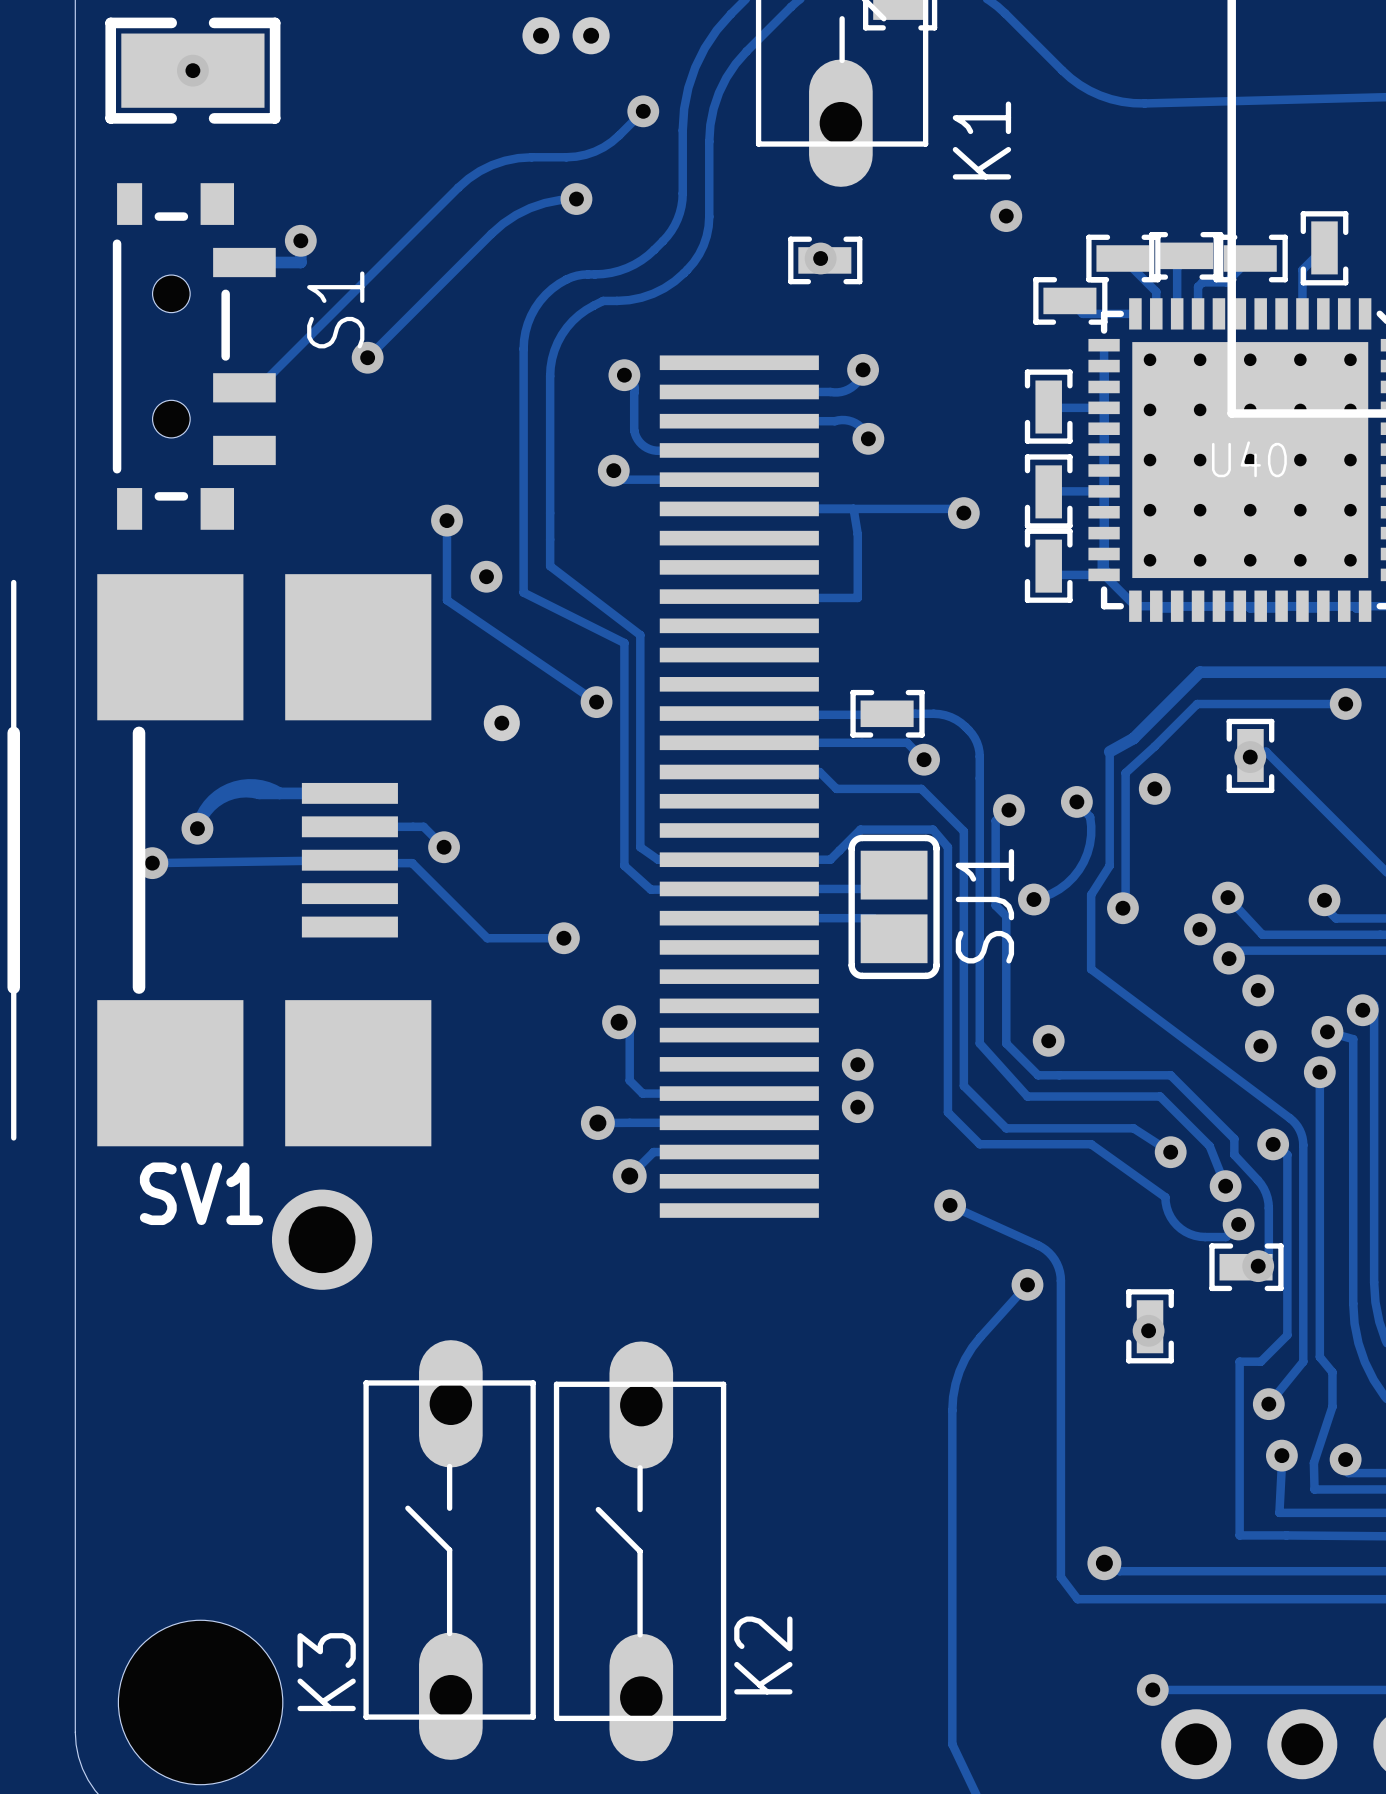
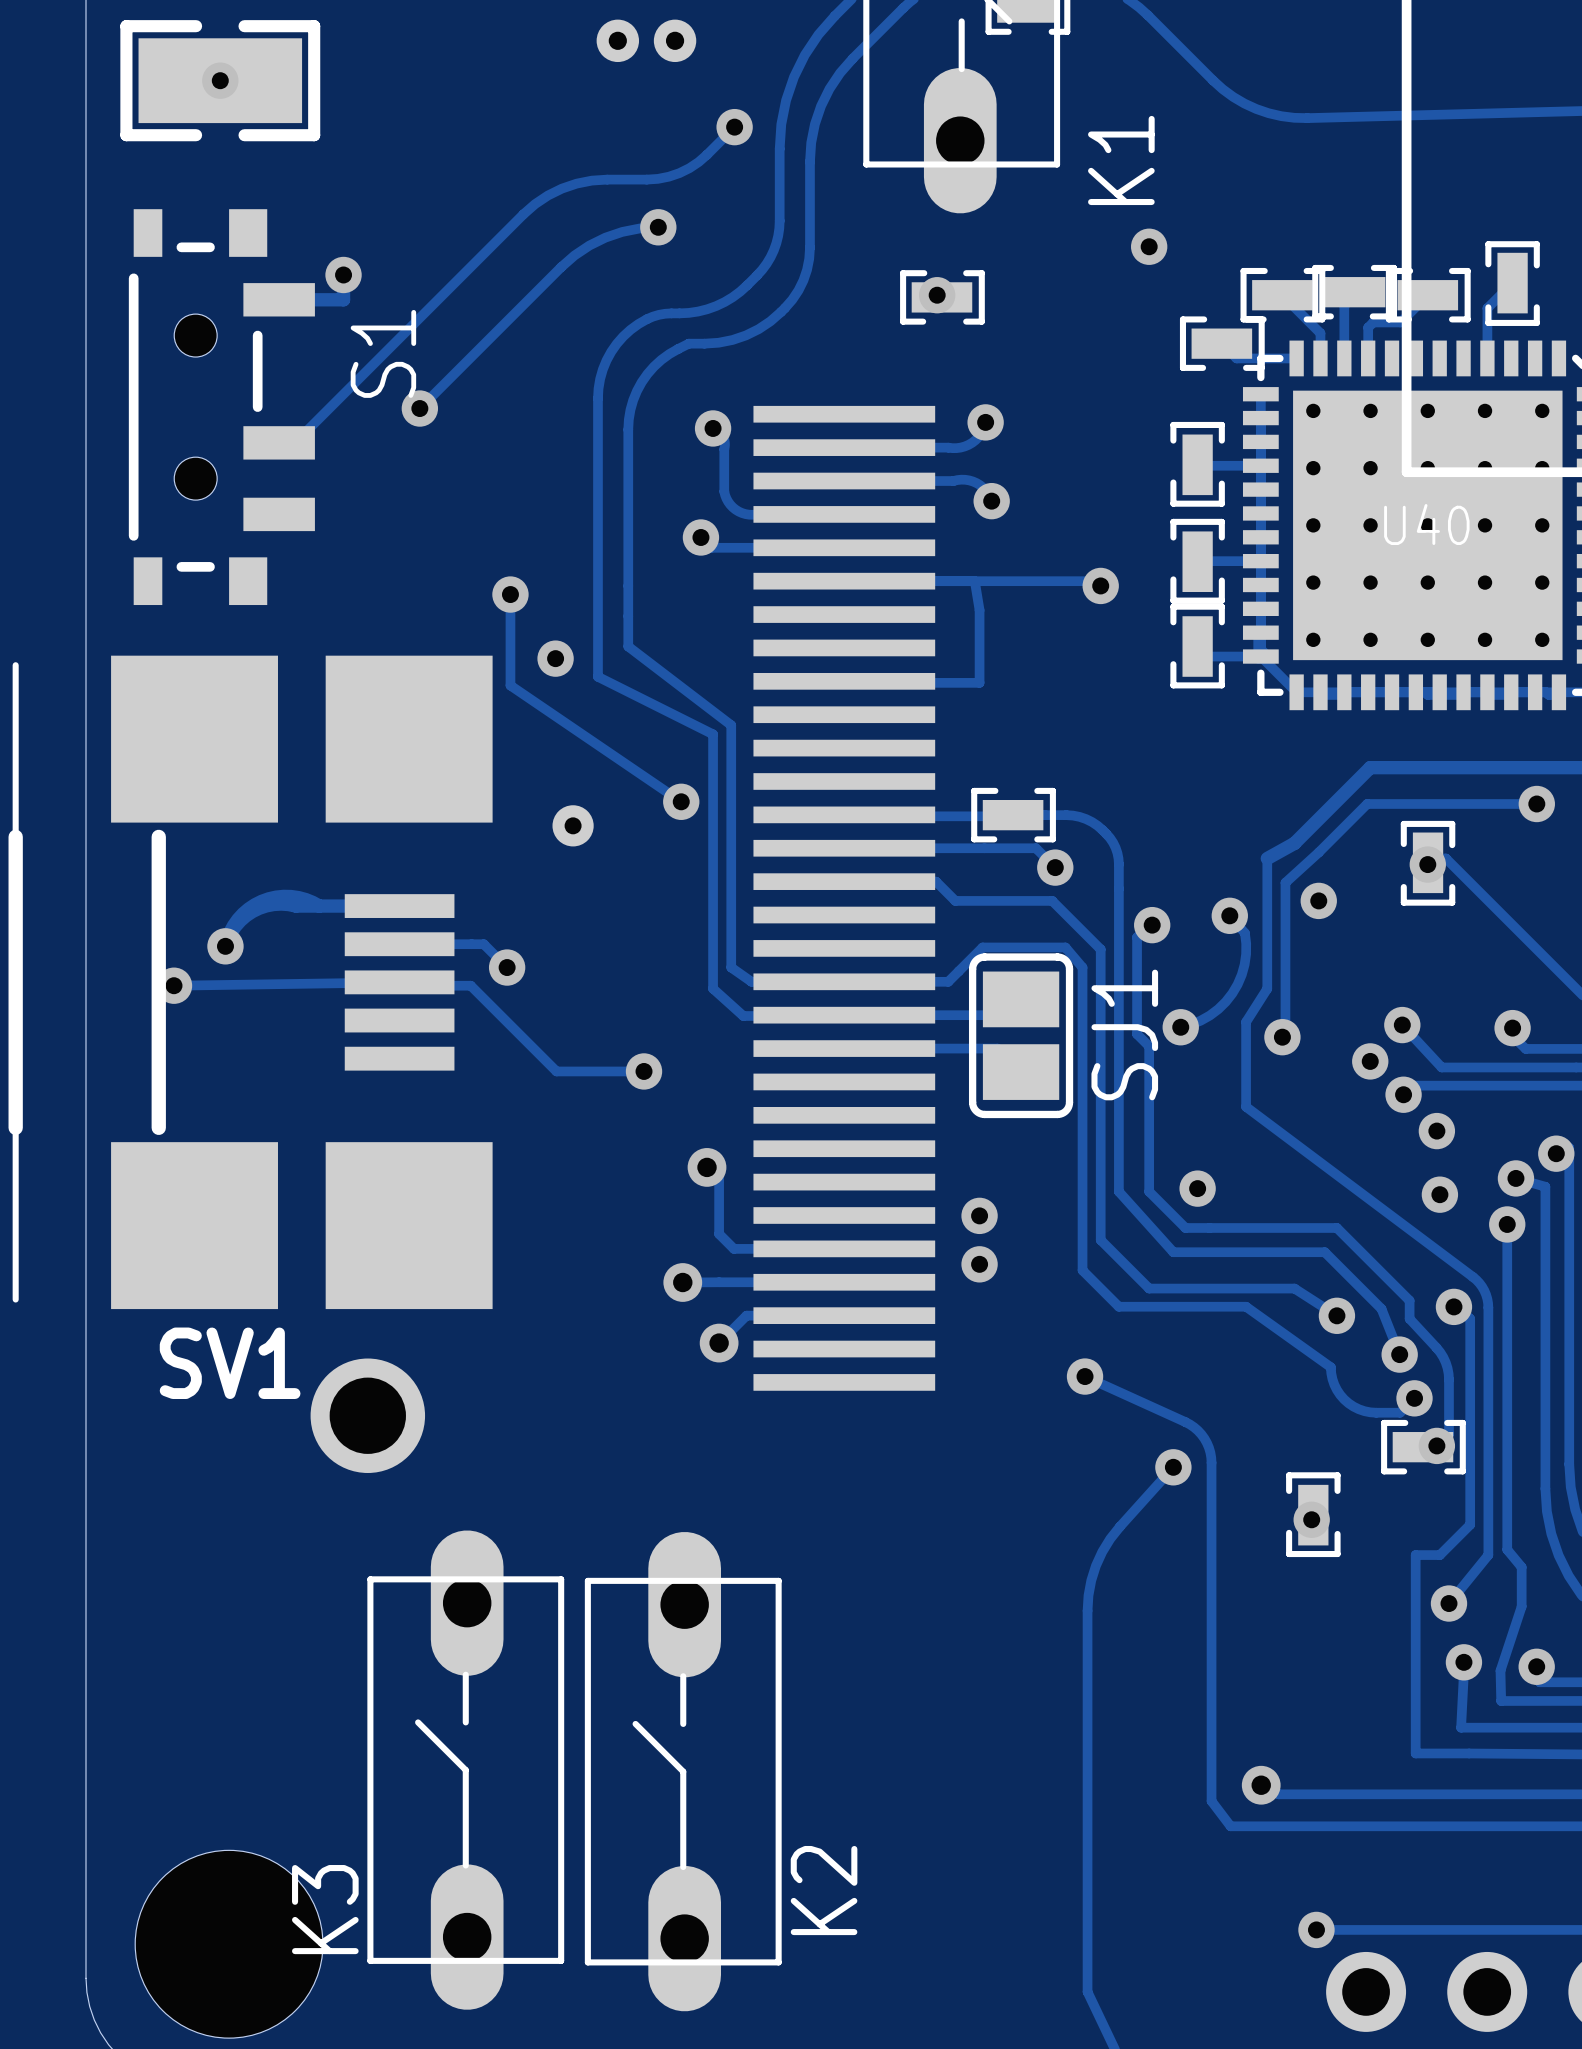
K3 position: (449, 1550) -> (465, 1770)
K2 position: (640, 1551) -> (683, 1771)

